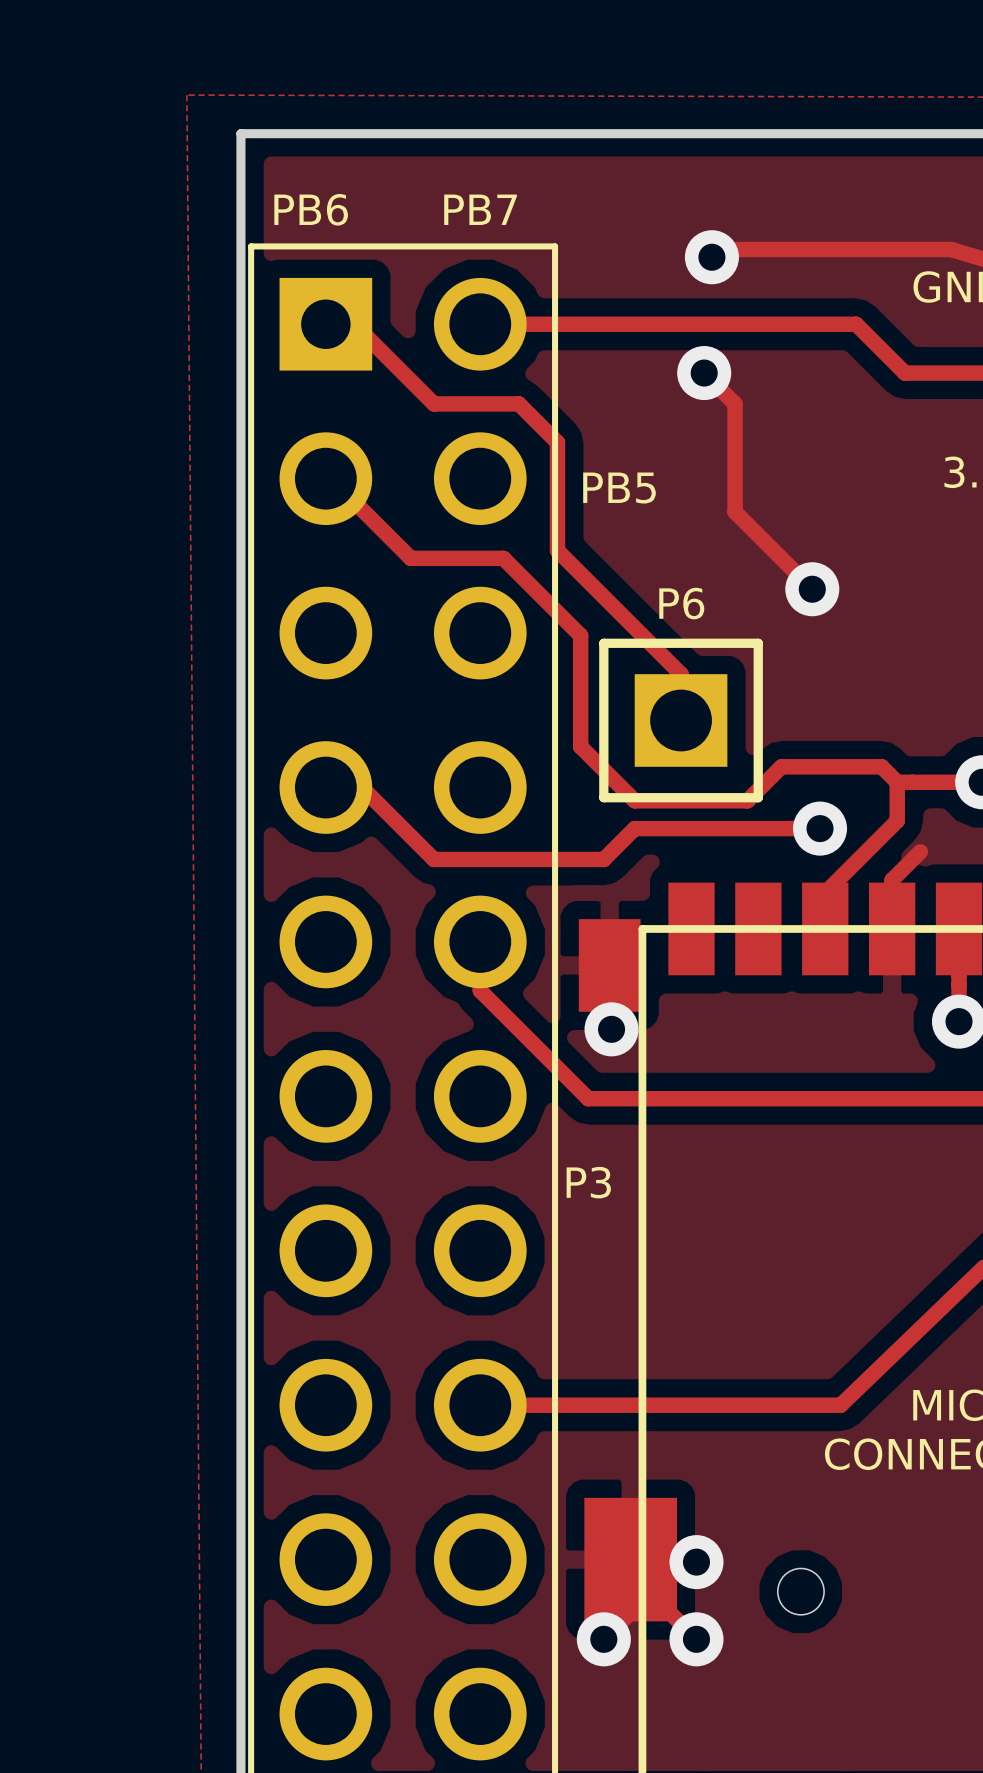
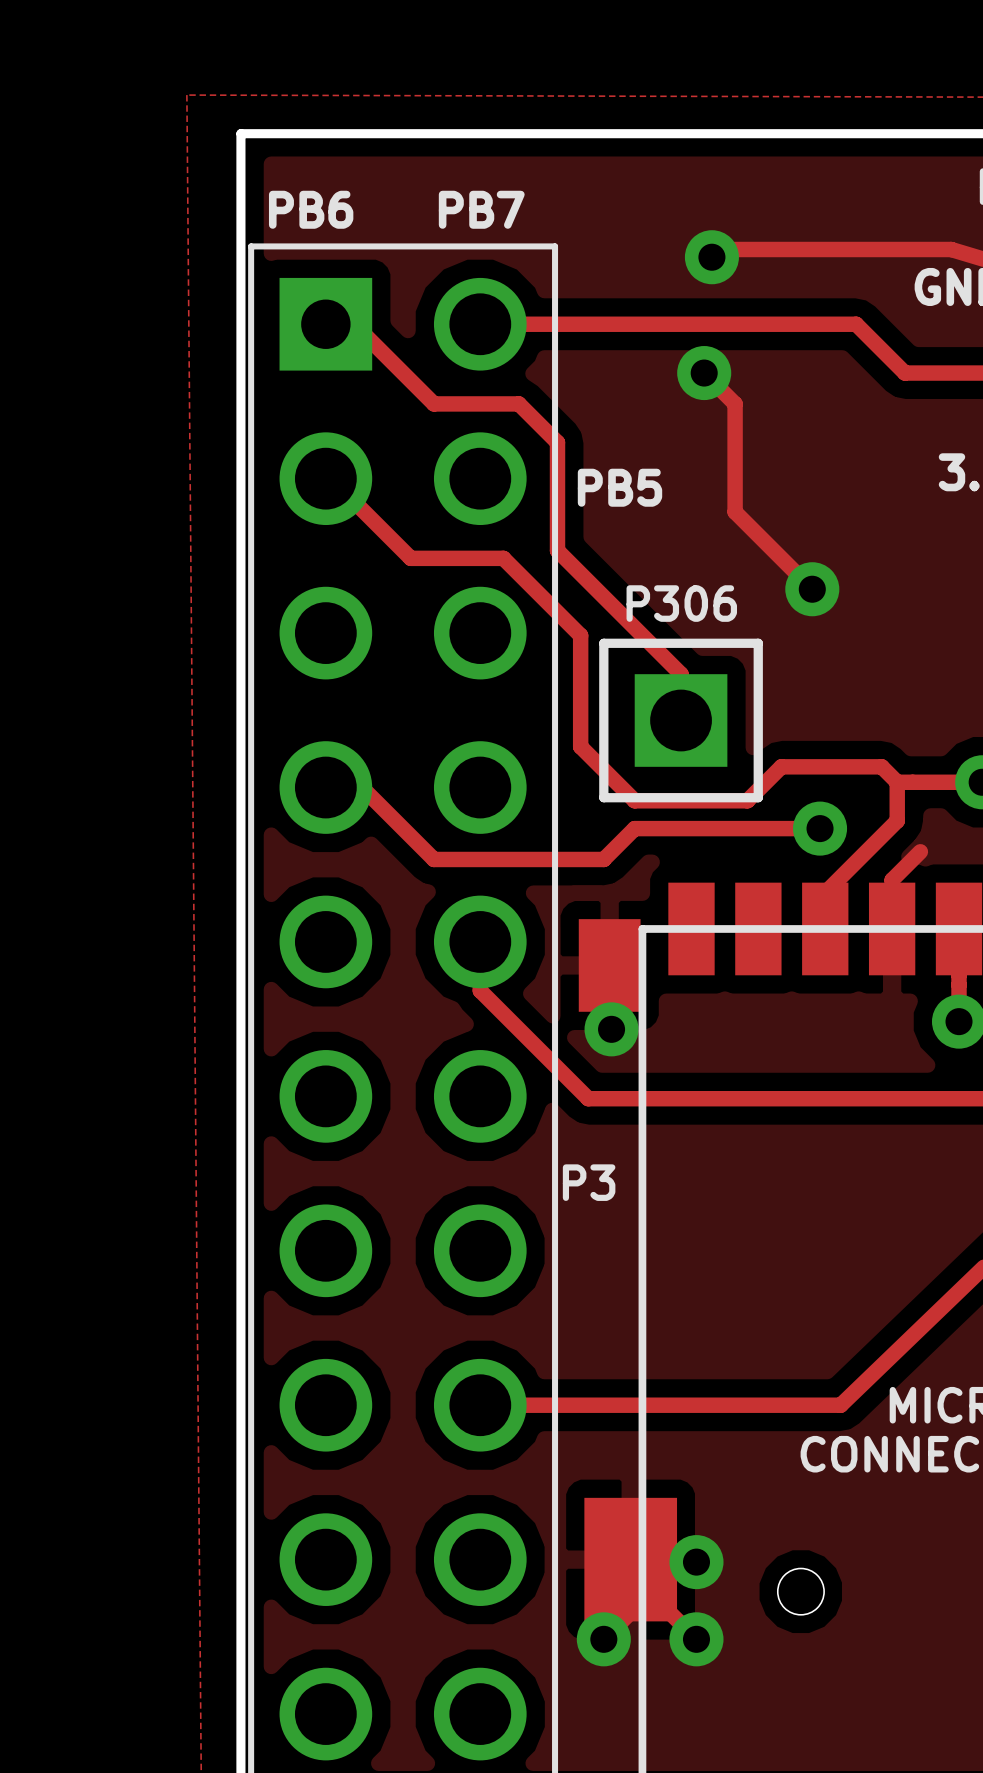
P6 name: P6 (681, 603) -> P306 (681, 603)

